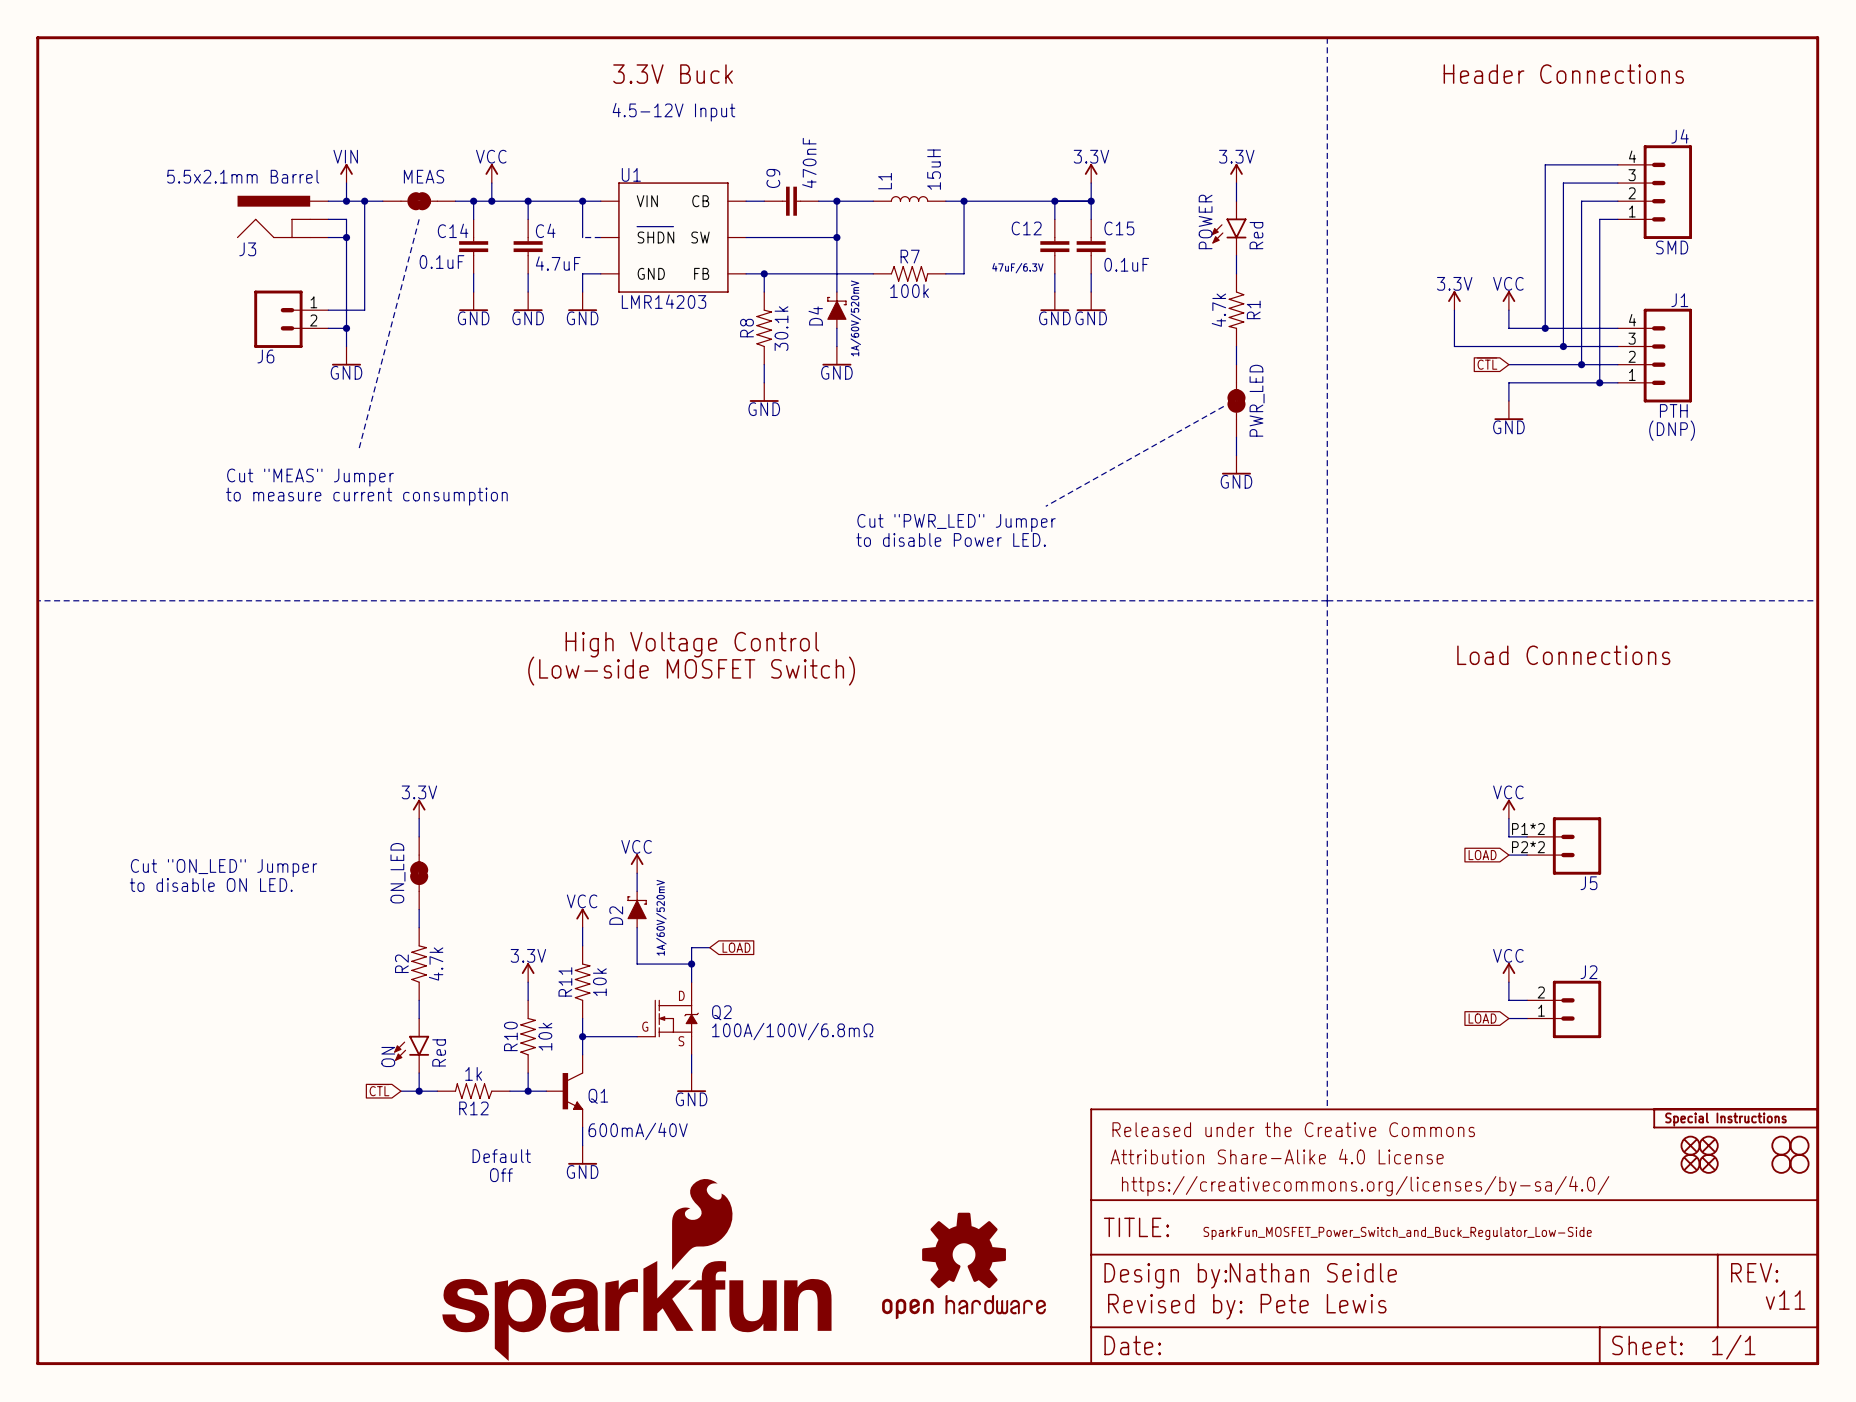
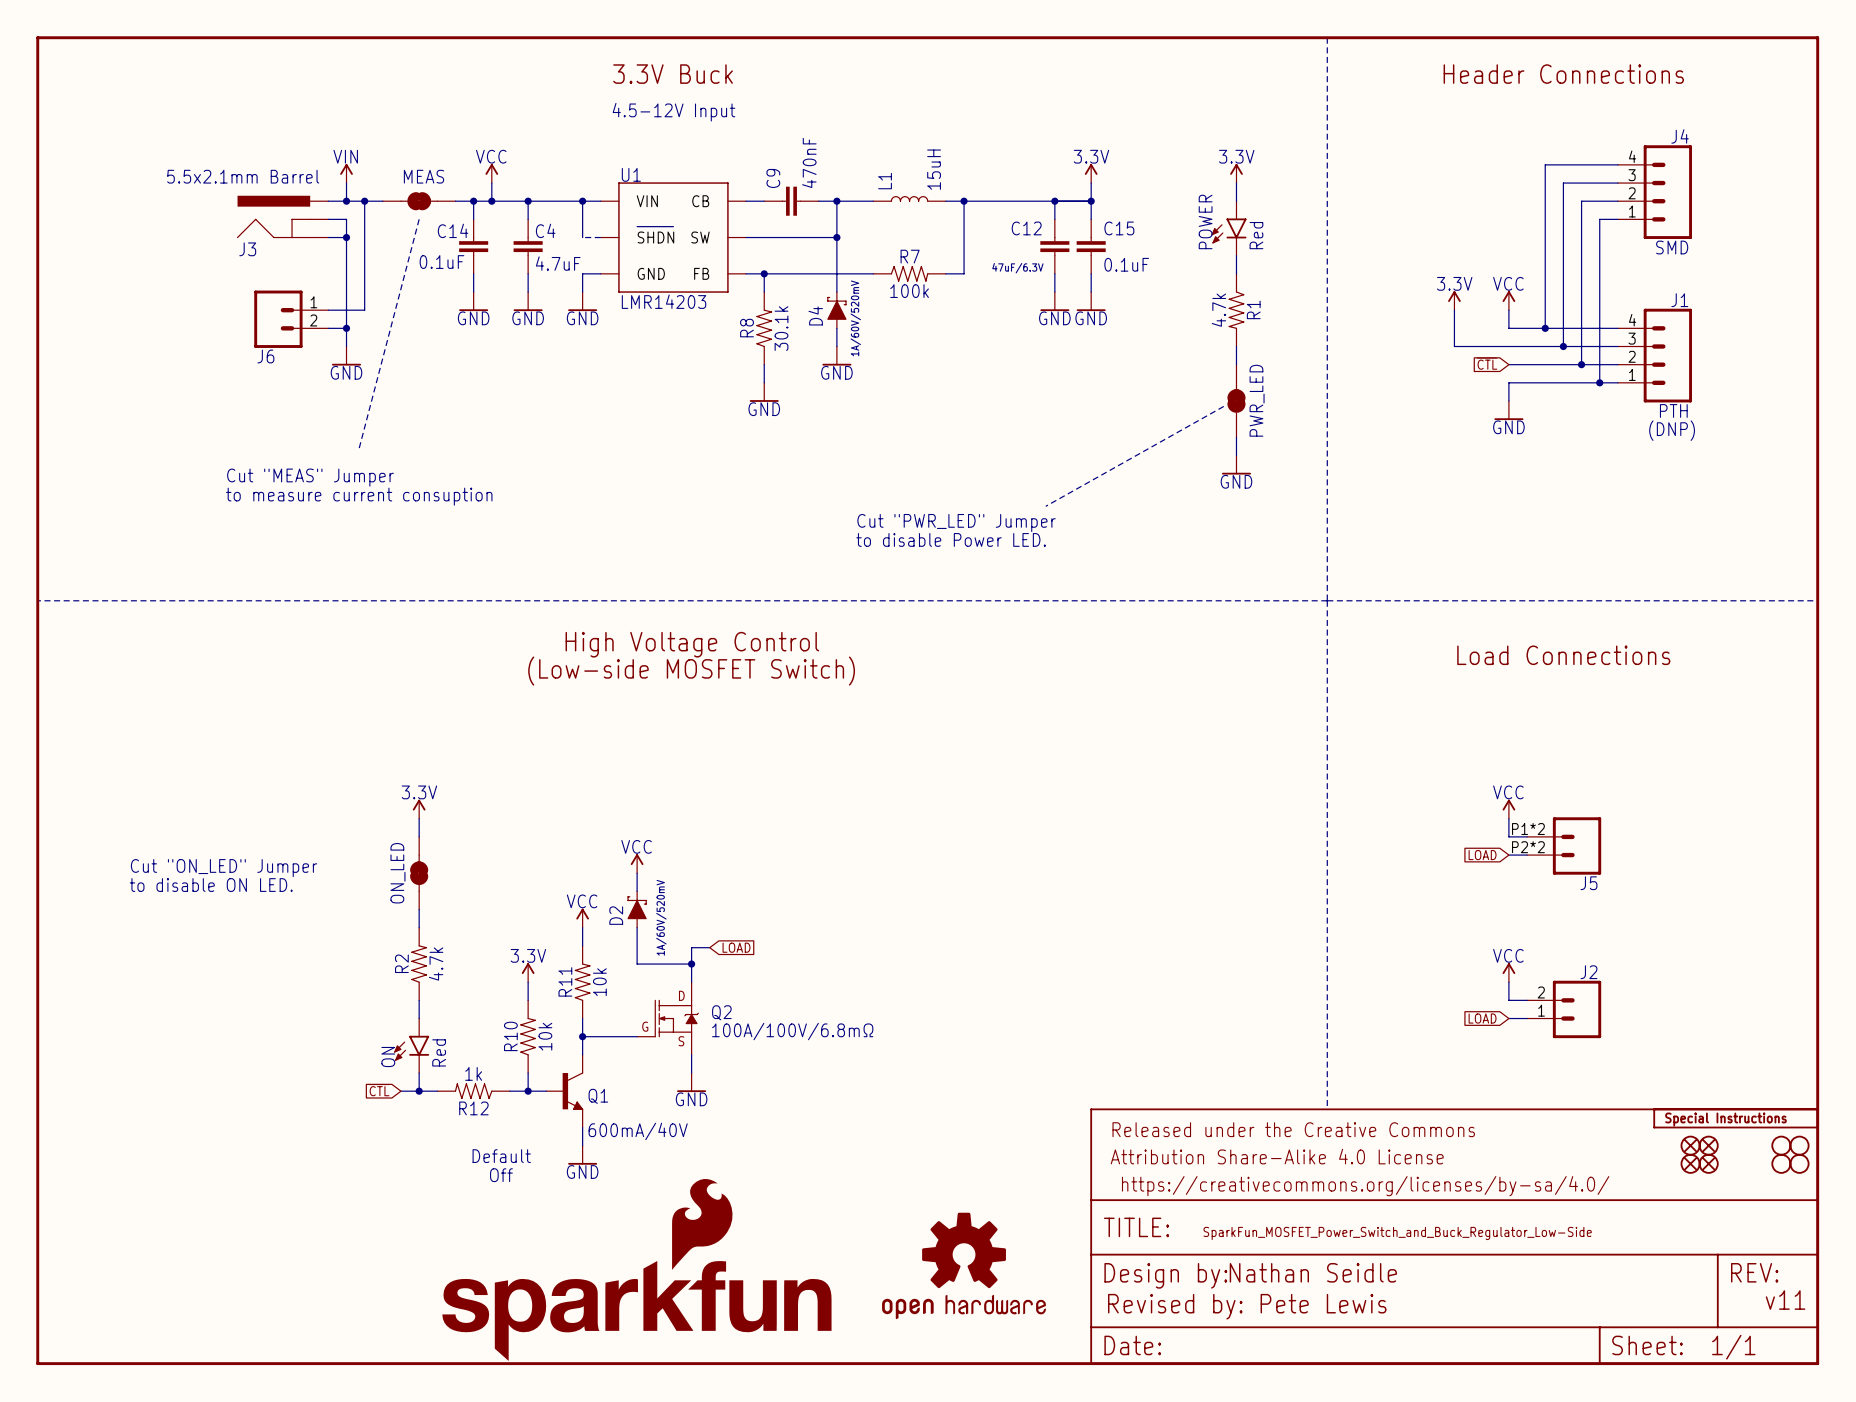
text: to measure current consumption (366, 496) -> to measure current consuption (359, 496)

